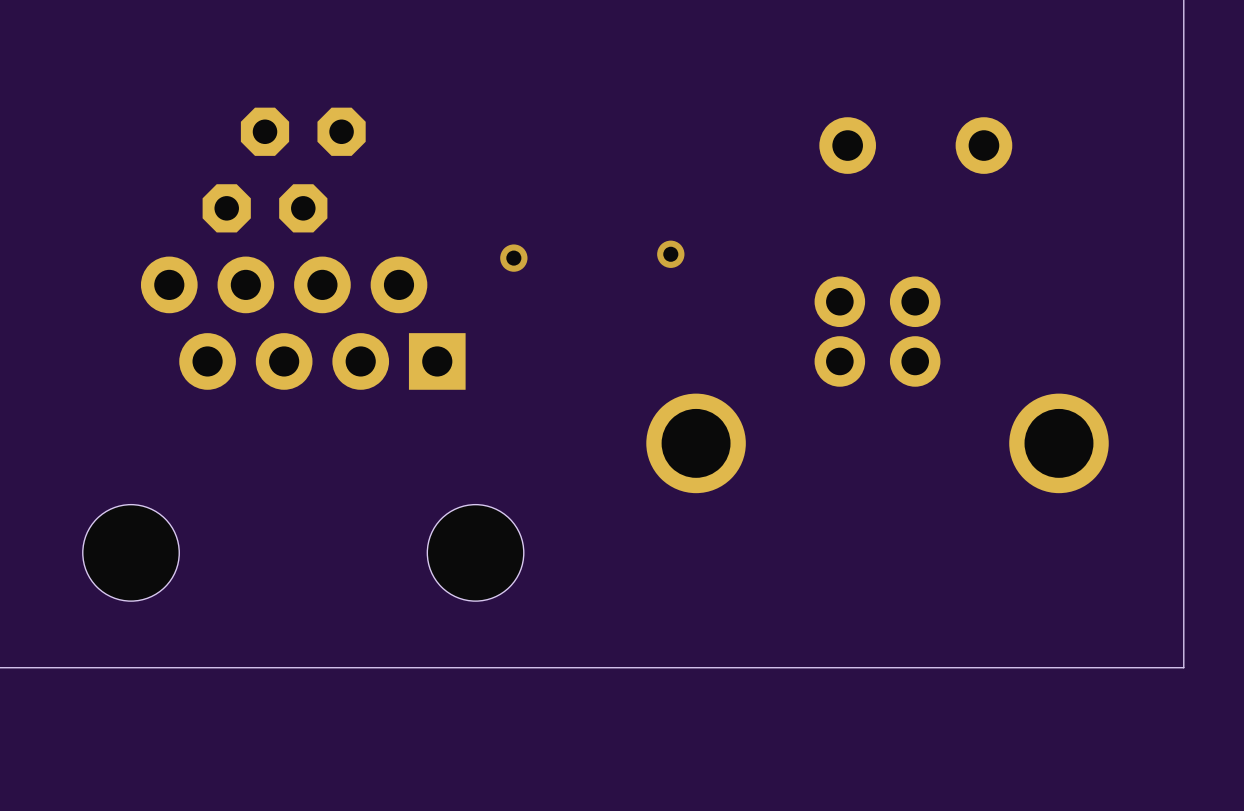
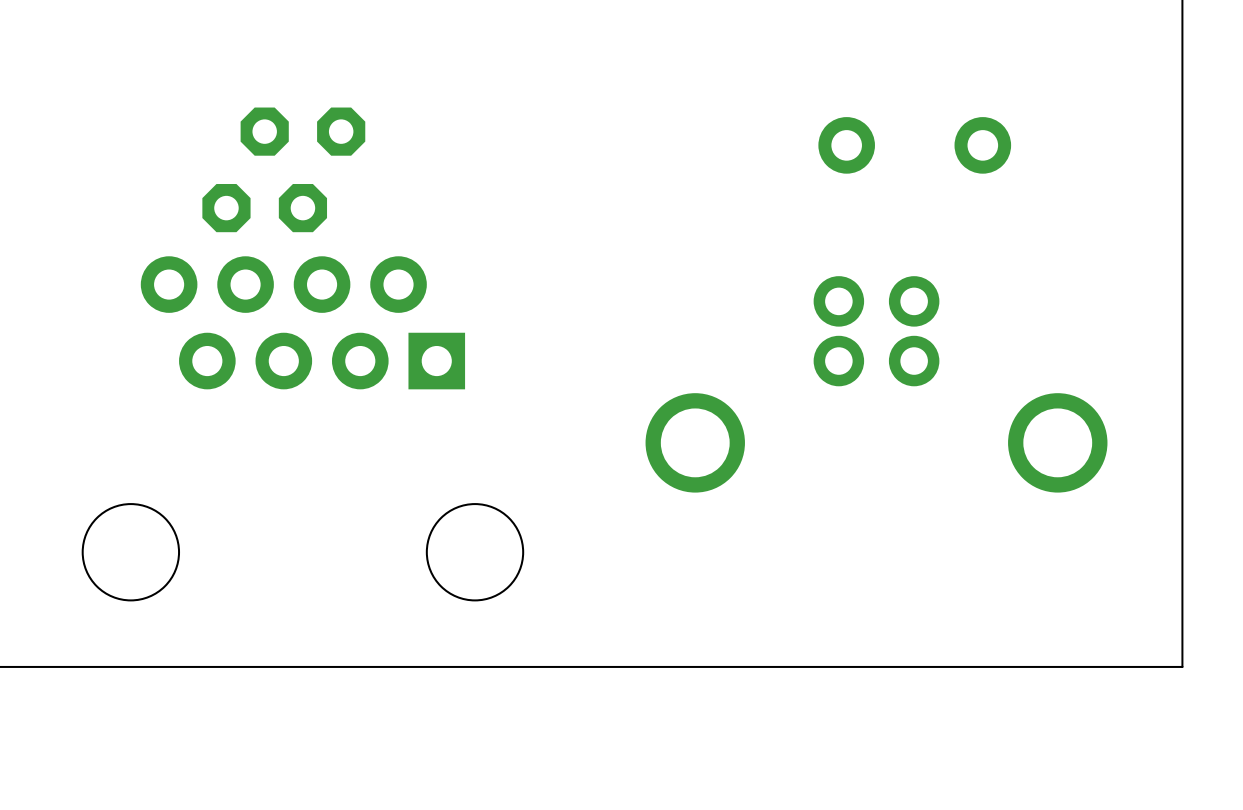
via: (670, 254) -> none
via: (513, 258) -> none

